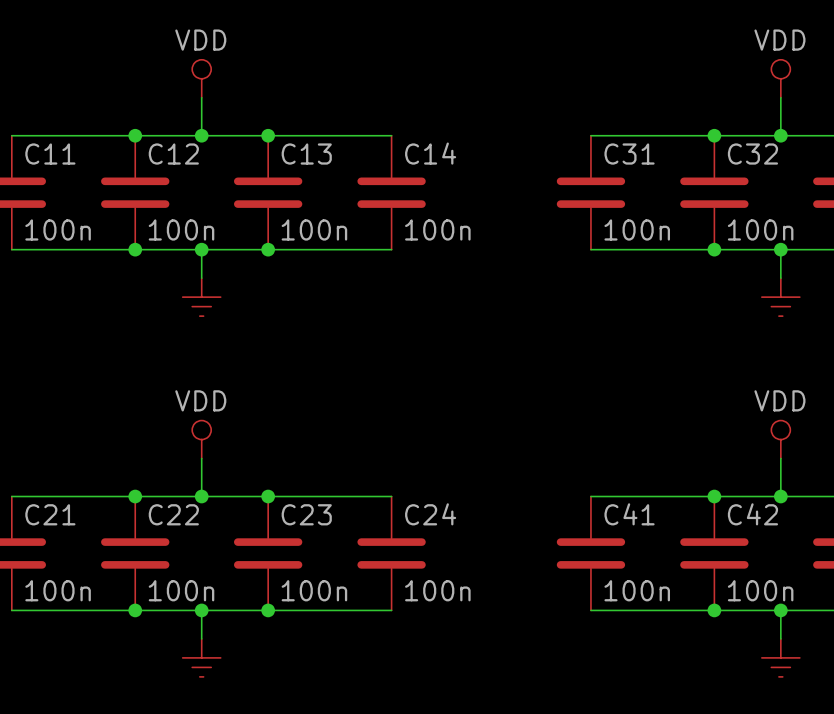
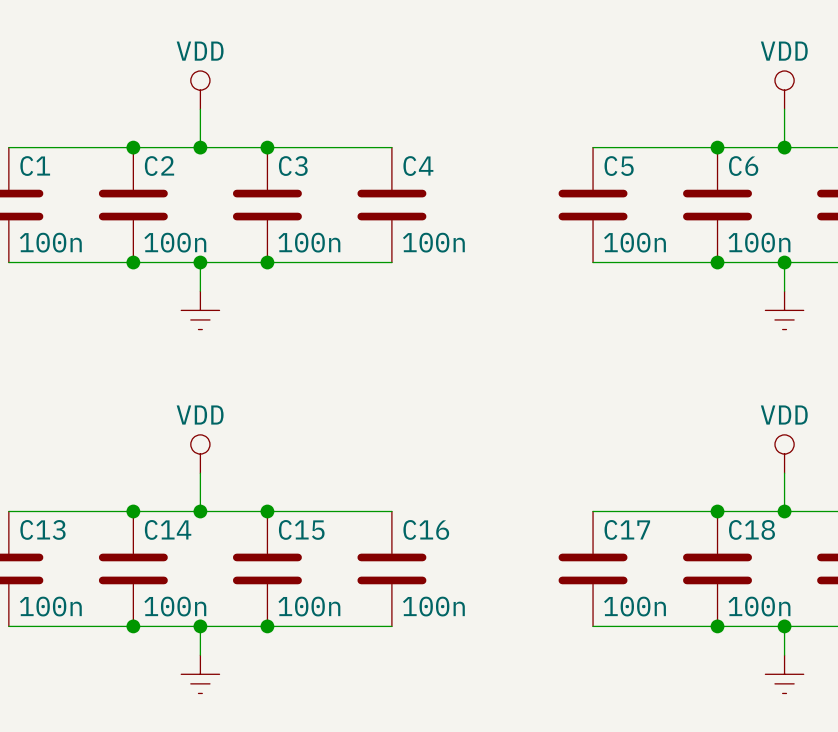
C14 name: C14 (430, 153) -> C4 (418, 166)
C11 name: C11 (50, 154) -> C1 (35, 166)
C12 name: C12 (173, 154) -> C2 (159, 166)
C13 name: C13 (306, 154) -> C3 (293, 166)
C31 name: C31 (629, 154) -> C5 (619, 166)
C32 name: C32 (752, 154) -> C6 (743, 166)
C21 name: C21 (50, 514) -> C13 (42, 529)
C22 name: C22 (173, 514) -> C14 (168, 529)
C23 name: C23 (306, 514) -> C15 (301, 529)
C24 name: C24 (430, 514) -> C16 (426, 529)
C41 name: C41 (629, 514) -> C17 (627, 529)
C42 name: C42 (752, 514) -> C18 (751, 529)

